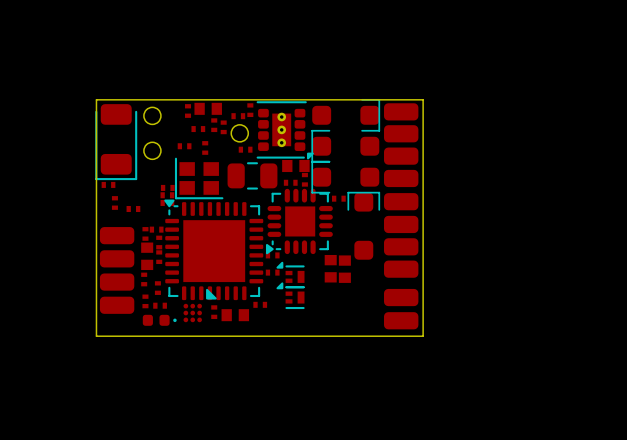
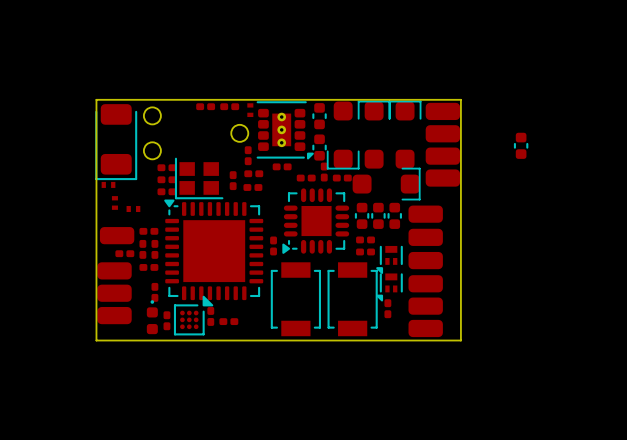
board edge: (423, 99) (423, 336) (96, 336) -> (423, 99) (460, 99) (460, 340) (96, 340) (96, 336)
part footprint: [194, 102, 222, 115] -> [196, 103, 216, 111]
part: none -> (229, 106)
part: (188, 111) -> none
part: (401, 111) -> none
part: none -> (442, 111)
part: (346, 115) -> none
part: (238, 116) -> none
part: none -> (319, 116)
part: (214, 125) -> none
part footprint: [384, 125, 419, 143] -> [388, 100, 422, 169]
part: (223, 127) -> none
part: (198, 129) -> none
part: none -> (442, 133)
part: none -> (374, 134)
part: none -> (343, 135)
part: none -> (521, 145)
part: (184, 146) -> none
part footprint: [238, 146, 253, 153] -> [244, 146, 252, 166]
part: (345, 146) -> none
part: (205, 147) -> none
part: none -> (319, 147)
part: (401, 156) -> none
part: none -> (442, 156)
part footprint: [311, 160, 380, 194] -> [332, 174, 352, 182]
part footprint: [227, 162, 278, 190] -> [244, 170, 264, 178]
part: none -> (282, 166)
part: (295, 166) -> none
part: none -> (166, 167)
part footprint: [301, 172, 308, 187] -> [296, 174, 316, 182]
part: none -> (324, 172)
part: (401, 178) -> none
part: none -> (442, 178)
part: none -> (166, 179)
part: none -> (233, 180)
part: (290, 182) -> none
part: none -> (386, 184)
part: (167, 187) -> none
part: none -> (252, 187)
part: none -> (166, 191)
part: (167, 195) -> none
part: (338, 198) -> none
part: (401, 201) -> none
part: (167, 202) -> none
part: none -> (425, 214)
part: none -> (362, 215)
part: none -> (378, 215)
part: none -> (394, 215)
part position: (299, 221) -> (315, 221)
part: (401, 224) -> none
part: (363, 225) -> none
part: (156, 229) -> none
part: none -> (148, 231)
part: (145, 233) -> none
part: none -> (425, 237)
part: none -> (365, 239)
part: (159, 242) -> none
part: (401, 246) -> none
part: none -> (142, 249)
part: none -> (154, 249)
part: none -> (365, 251)
part footprint: [265, 252, 280, 259] -> [270, 236, 277, 256]
part: none -> (124, 253)
part: (147, 256) -> none
part: (159, 257) -> none
part: (117, 258) -> none
part: none -> (389, 259)
part: none -> (425, 260)
part: none -> (148, 267)
part: (330, 268) -> none
part: (344, 269) -> none
part: (401, 269) -> none
part: none -> (114, 270)
part: (272, 272) -> none
part: (290, 275) -> none
part: (144, 279) -> none
part footprint: [154, 281, 161, 295] -> [151, 282, 159, 302]
part: (117, 282) -> none
part footprint: [276, 282, 305, 310] -> [270, 262, 322, 337]
part: none -> (425, 283)
part: none -> (389, 287)
part: none -> (114, 293)
part: (401, 297) -> none
part: none -> (352, 299)
part: (145, 301) -> none
part: (260, 304) -> none
part: (117, 305) -> none
part: (160, 305) -> none
part: (200, 305) -> none
part footprint: [211, 305, 218, 320] -> [207, 306, 215, 326]
part: none -> (425, 306)
part: none -> (387, 308)
part: none -> (114, 315)
part: none -> (193, 315)
part: (235, 315) -> none
part rotation: 0° (159, 320) -> 90° counterclockwise (152, 317)
part: none -> (166, 320)
part: (401, 320) -> none
part: none -> (228, 321)
part: none -> (425, 328)

